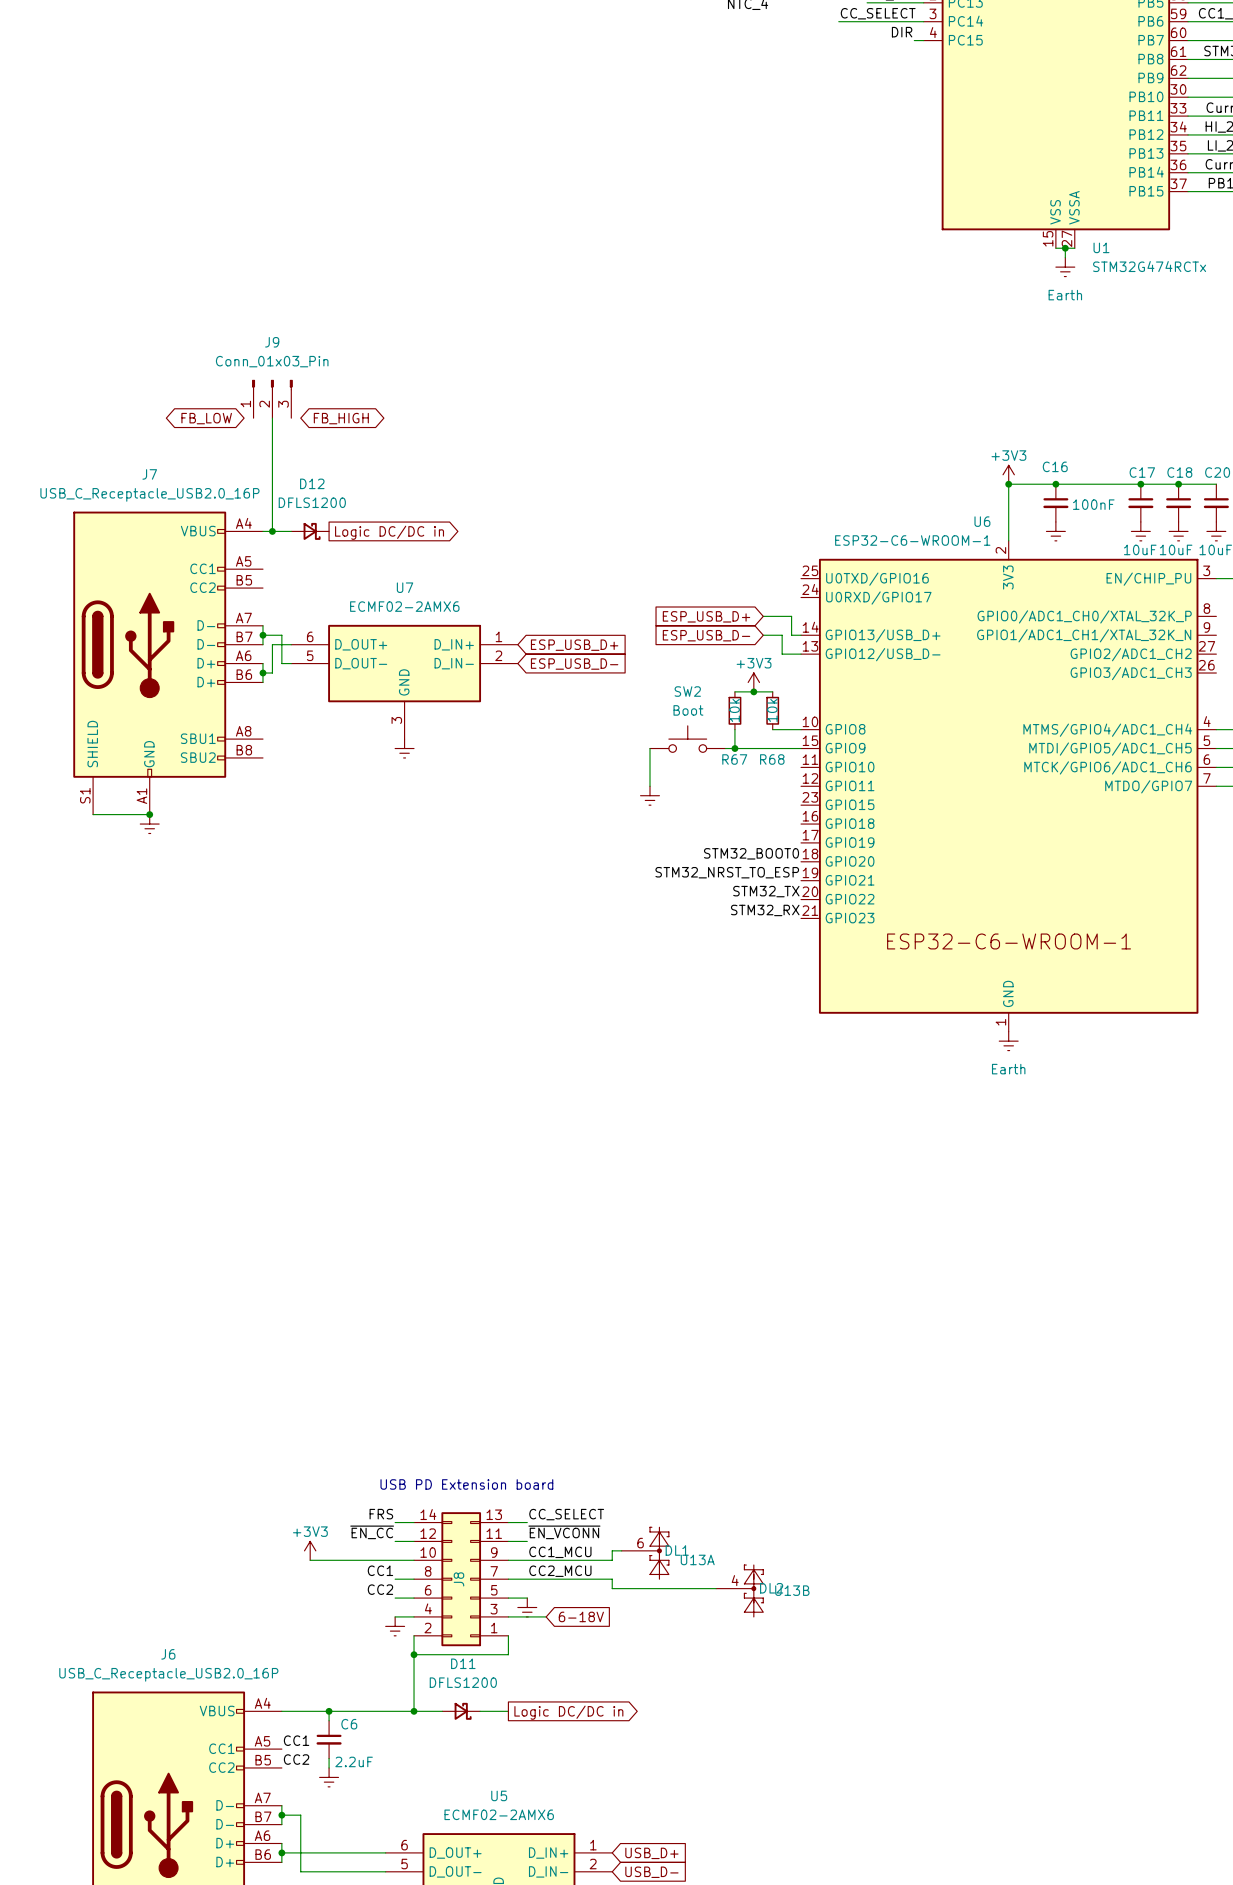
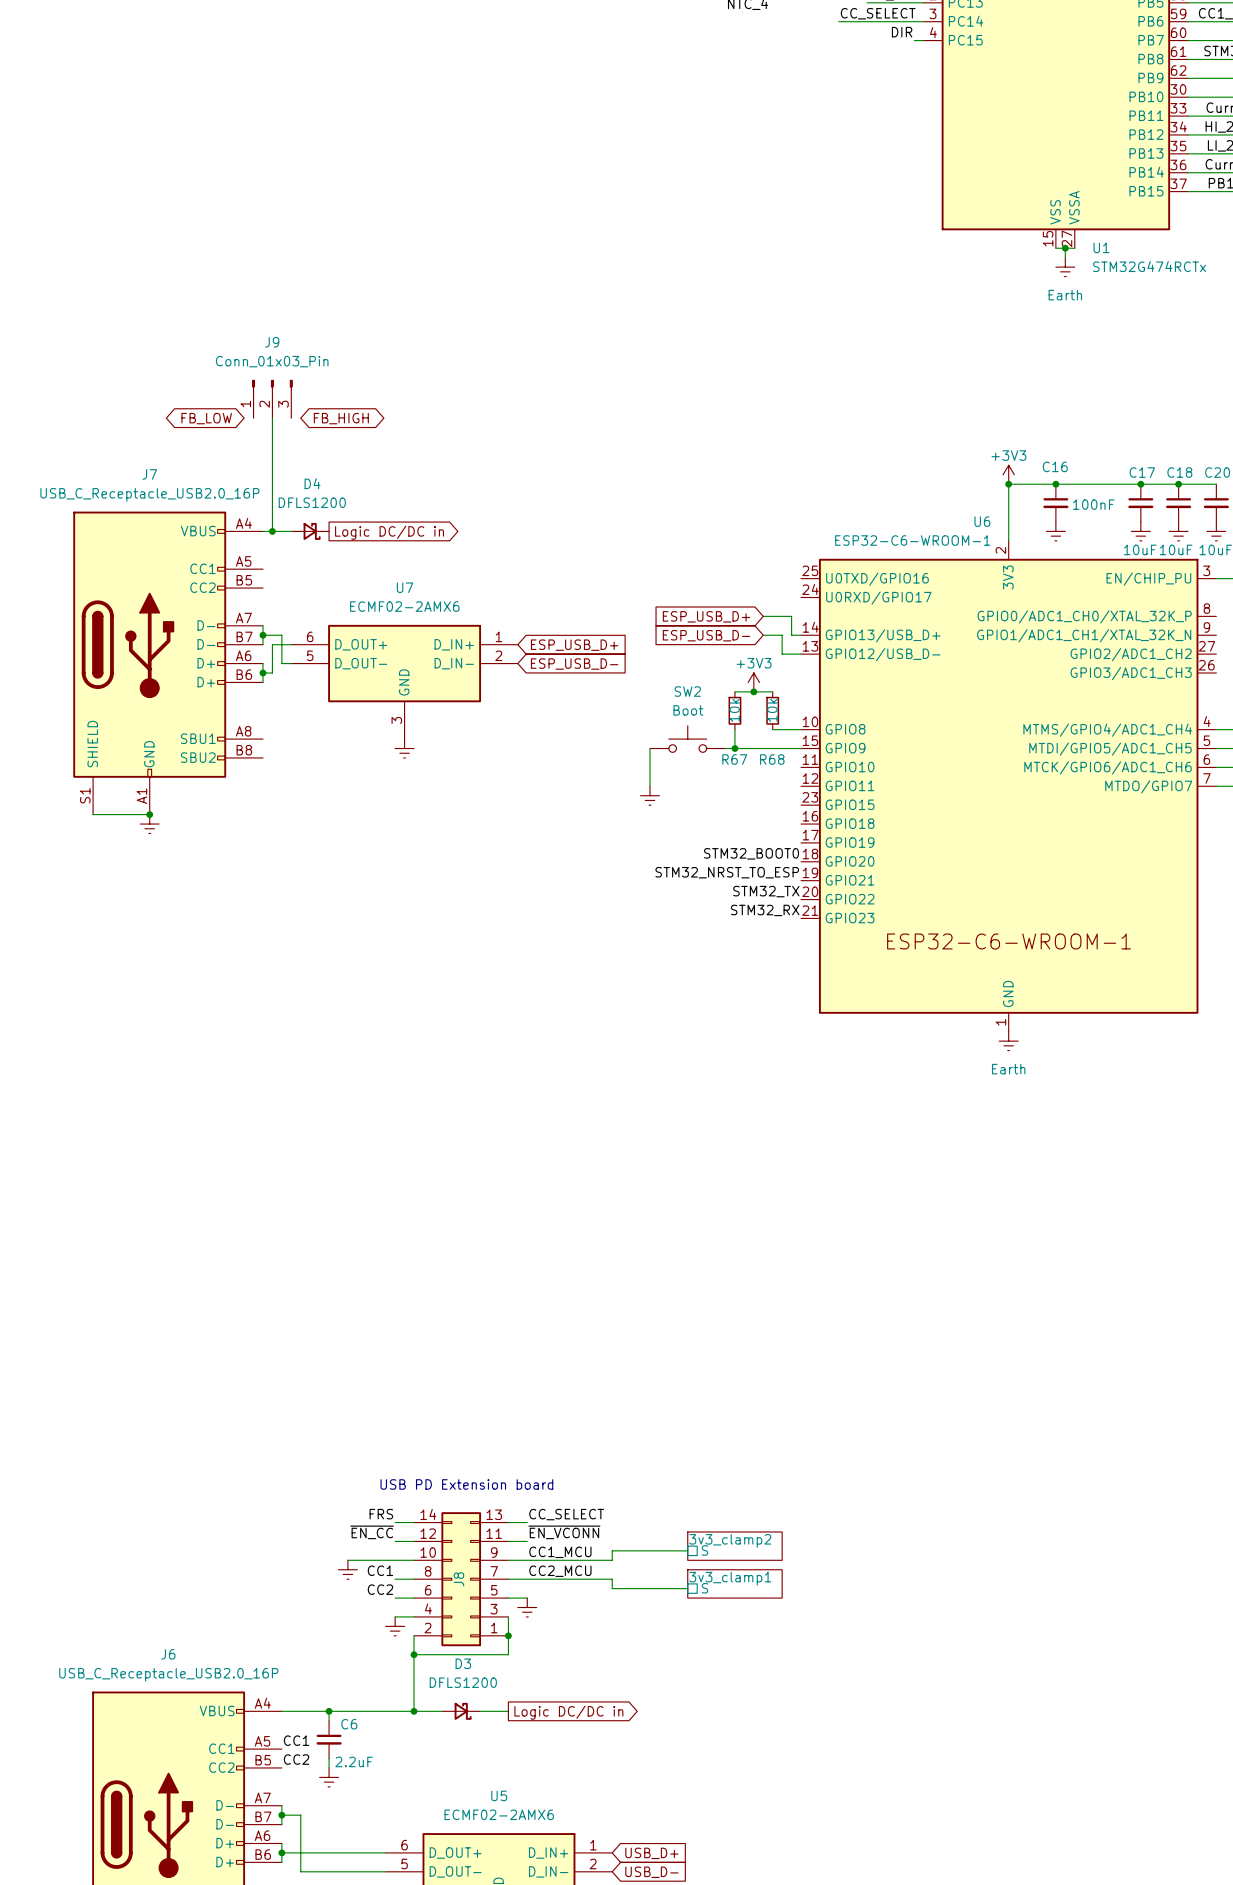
D12 name: D12 (312, 483) -> D4 (312, 483)
sheet 3v3_clamp2: none -> (734, 1546)
power symbol: +3V3 (310, 1550) -> none
sheet pin: none -> S (704, 1550)
wire: (310, 1560) (347, 1560) -> none
U13A: (645, 1560) -> none
power symbol: none -> (347, 1569)
sheet 3v3_clamp1: none -> (734, 1583)
wire: (687, 1588) (716, 1588) -> none
sheet pin: none -> S (704, 1588)
U13B: (739, 1590) -> none
wire: (508, 1616) (546, 1616) -> (508, 1616) (508, 1635)
global label: 6-18V (581, 1616) -> none
junction: none -> (508, 1635)
D11 name: D11 (463, 1663) -> D3 (463, 1663)

